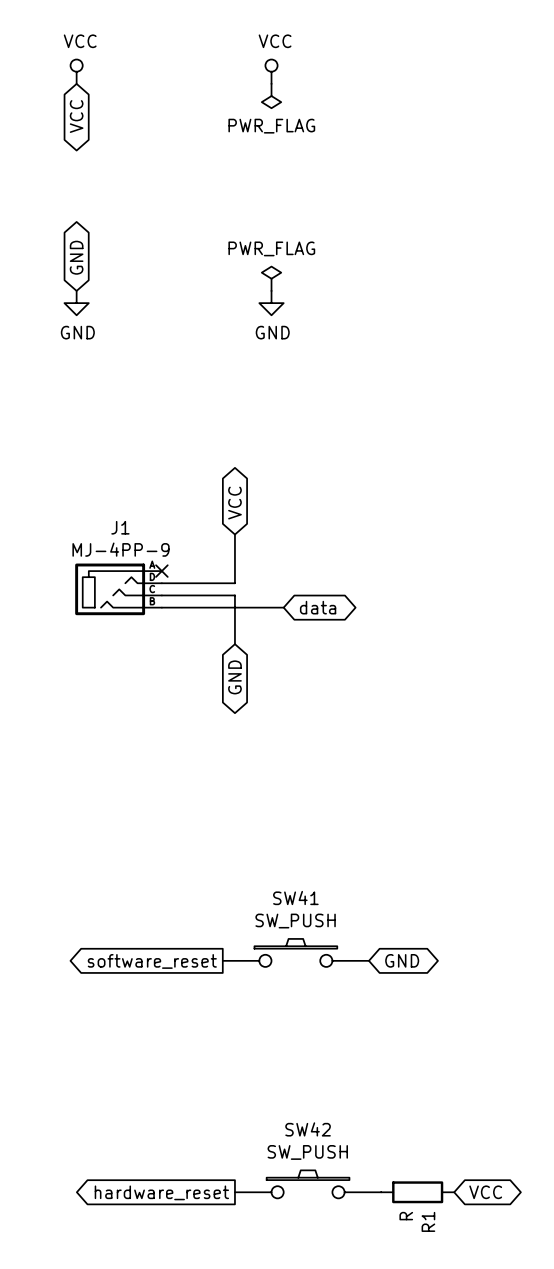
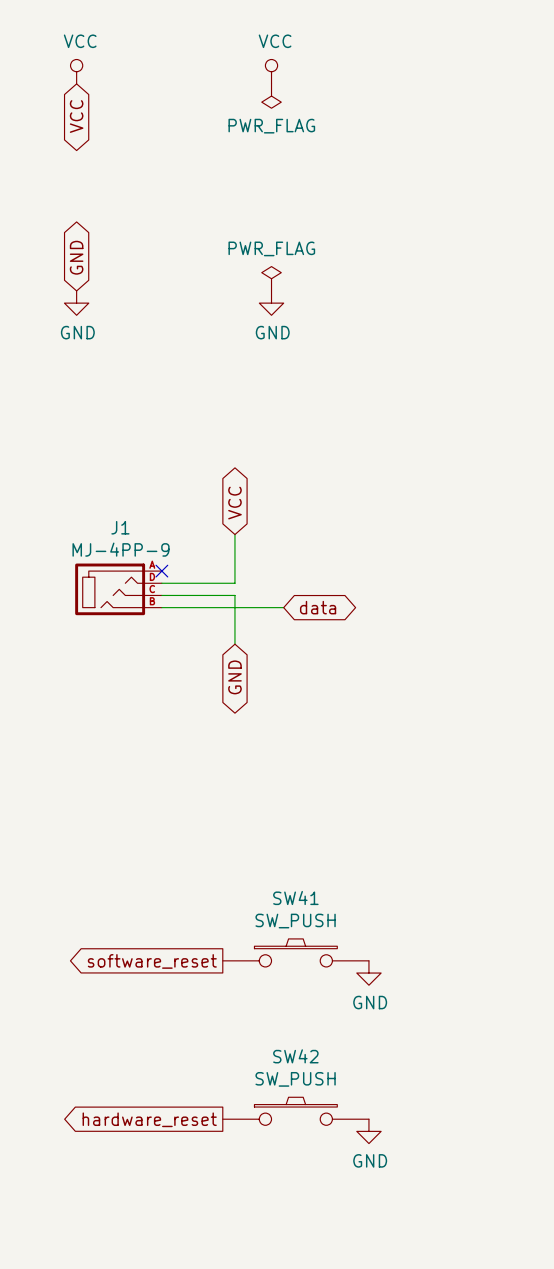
global label: GND (402, 960) -> none
power symbol: none -> GND (368, 973)
power symbol: none -> GND (368, 1131)
SW42 position: (308, 1184) -> (295, 1111)
global label position: hardware_reset (161, 1192) -> hardware_reset (149, 1119)
R1: R (417, 1192) -> none
global label: VCC (485, 1192) -> none

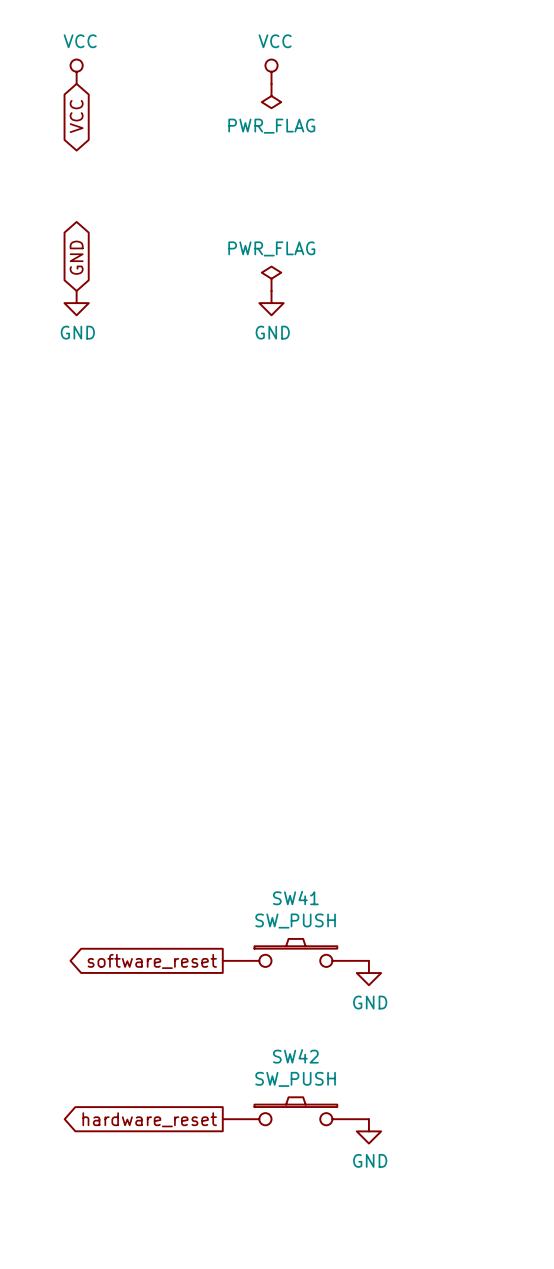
global label: VCC (234, 503) -> none
wire: (234, 534) (234, 583) (161, 583) -> none
no-connect mark: (161, 571) -> none
J1: MJ-4PP-9 (118, 589) -> none
wire: (161, 595) (234, 595) (234, 644) -> none
wire: (161, 607) (283, 607) -> none
global label: data (318, 607) -> none
global label: GND (234, 677) -> none

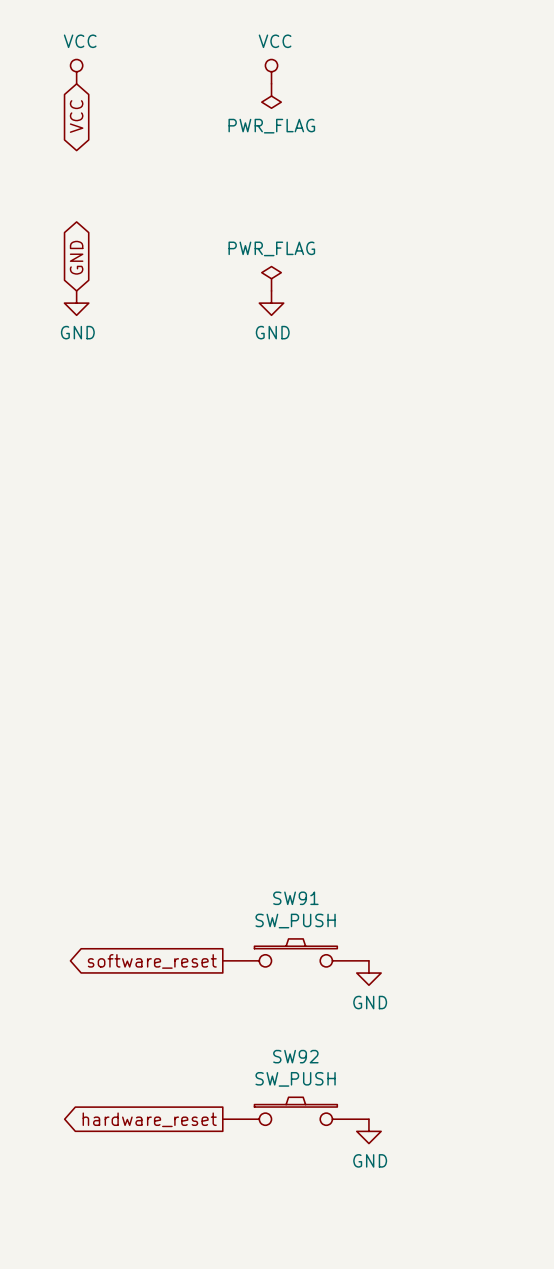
SW41 name: SW41 (295, 897) -> SW91 (295, 898)
SW42 name: SW42 (295, 1056) -> SW92 (295, 1056)

